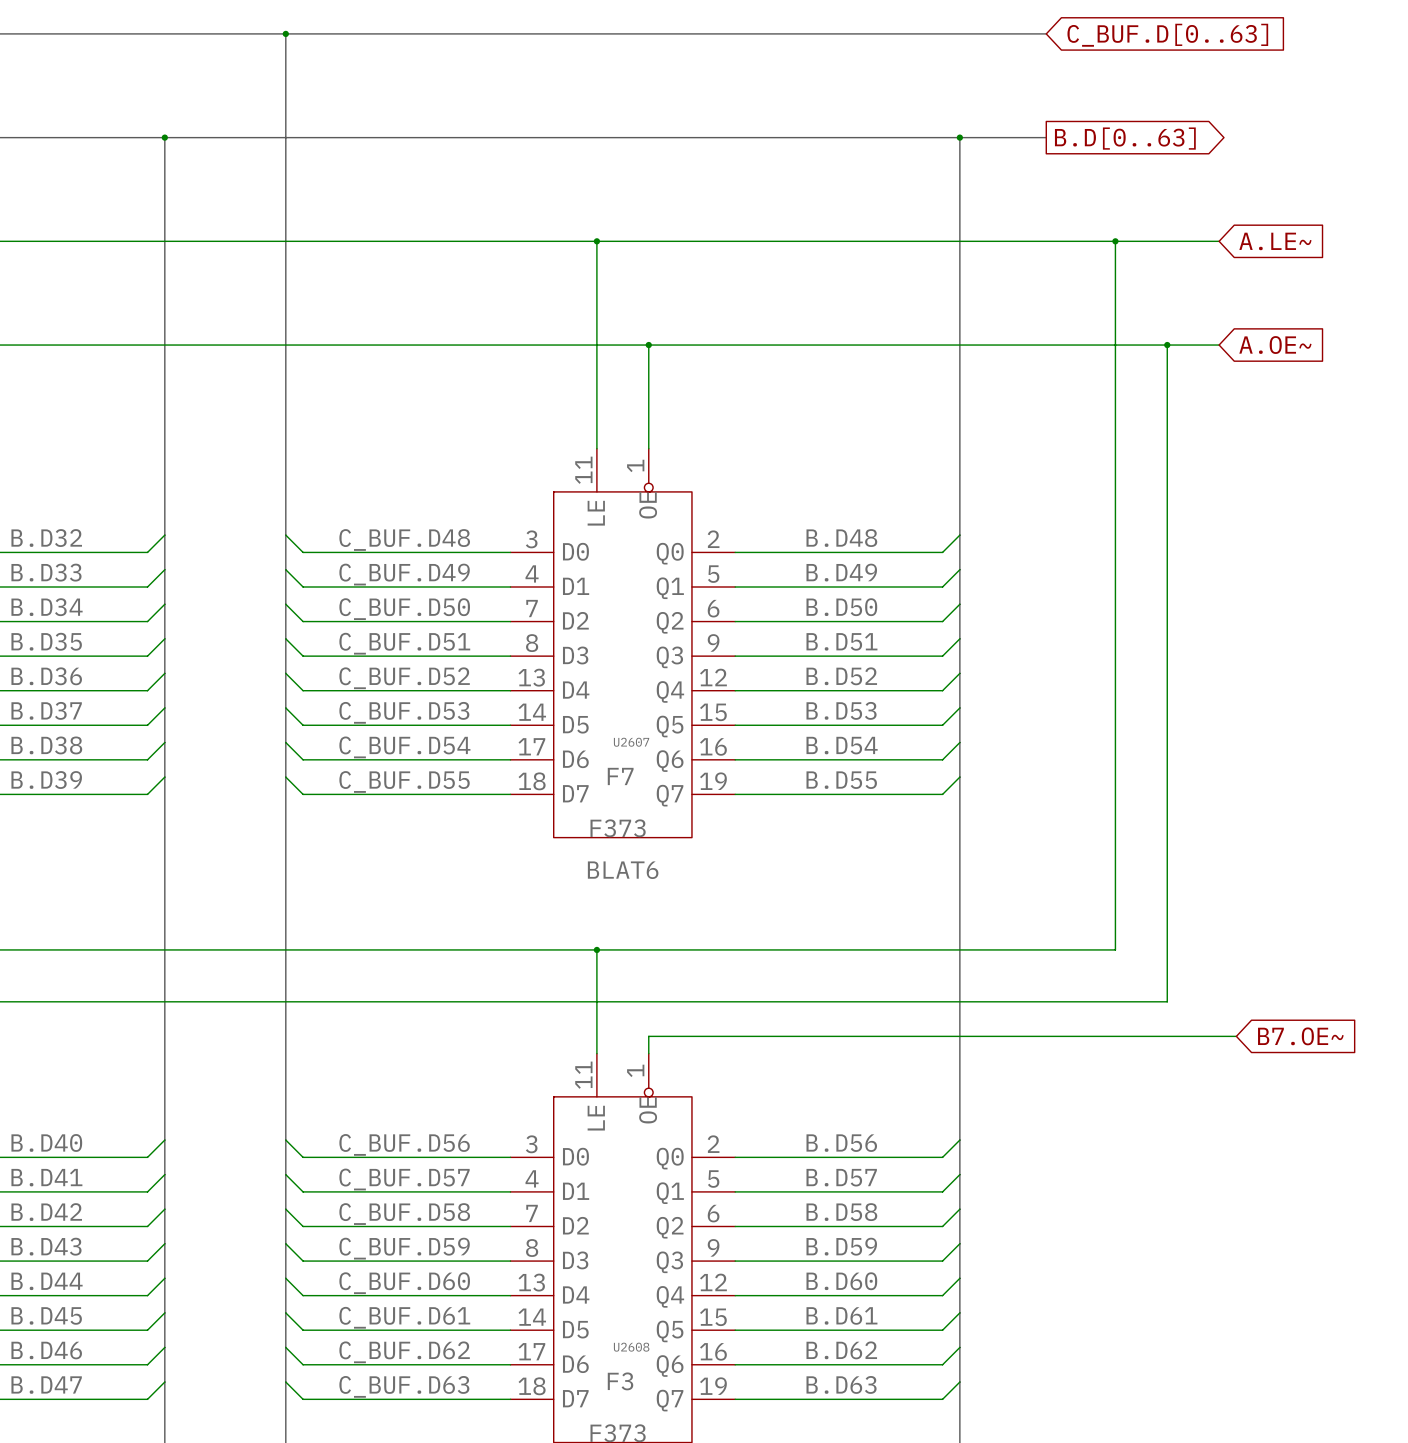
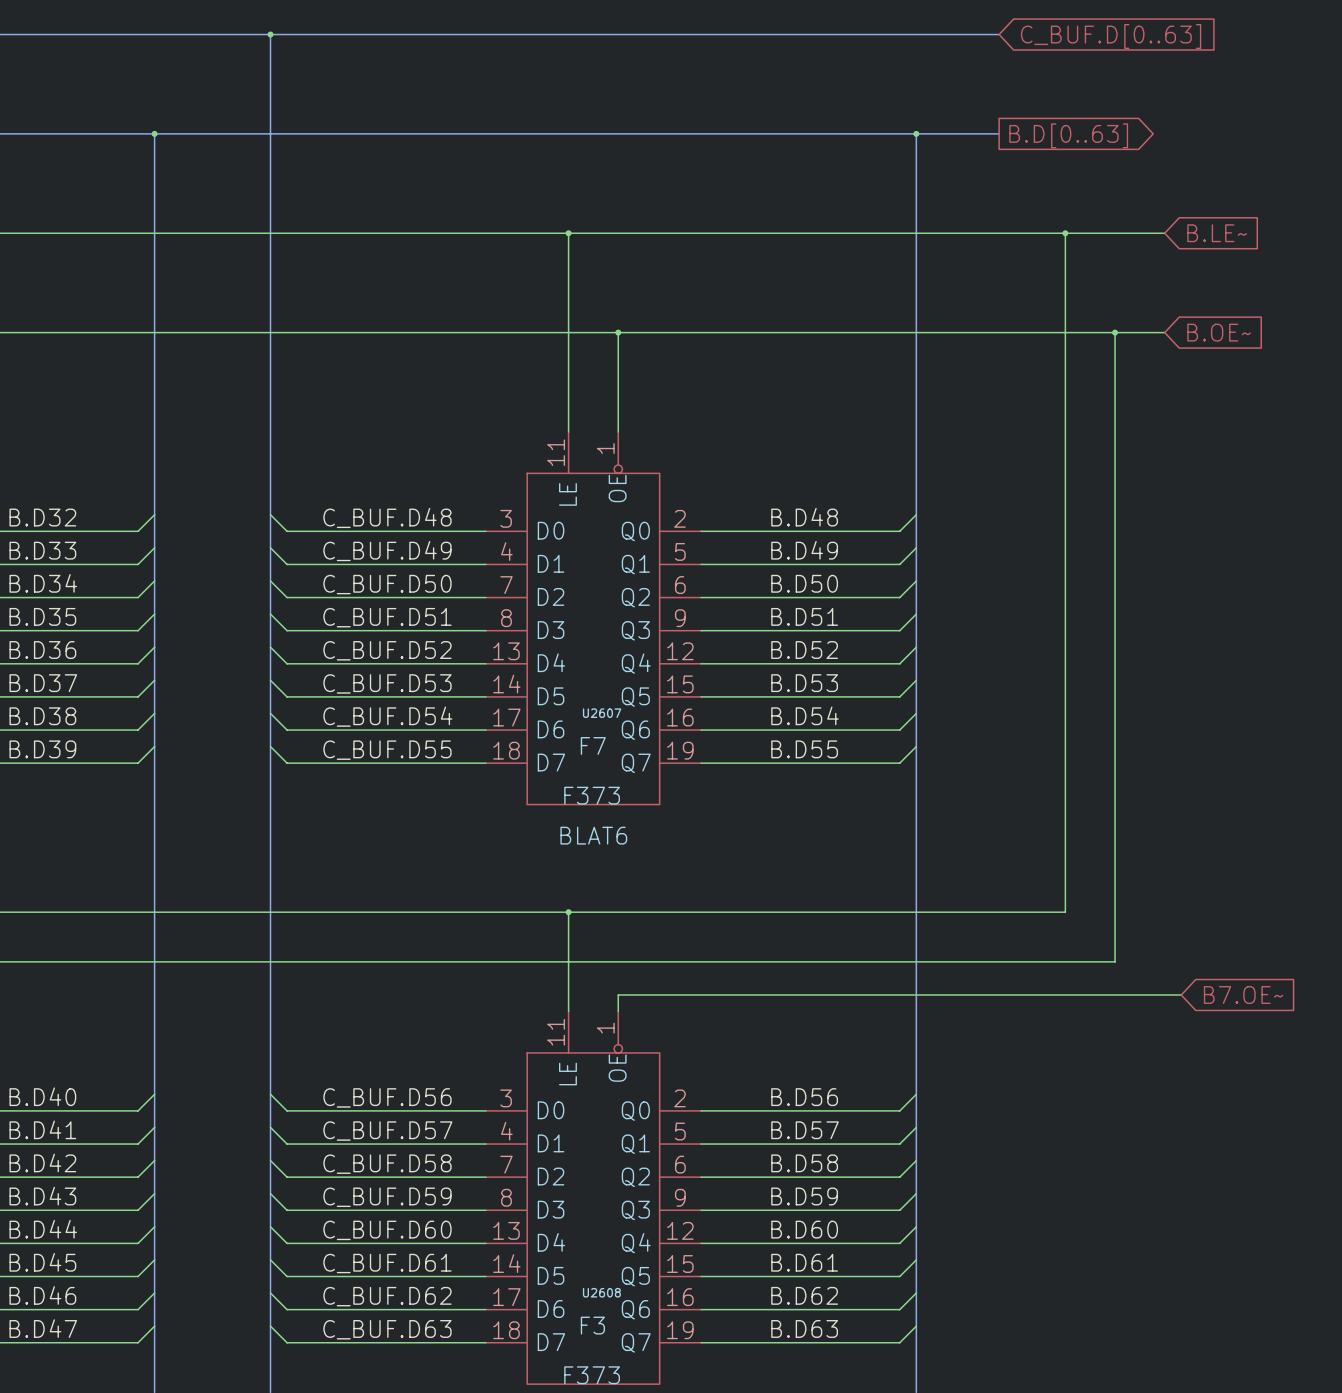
global label: A.LE~ (1275, 241) -> B.LE~ (1217, 233)
global label: A.OE~ (1275, 345) -> B.OE~ (1219, 332)

